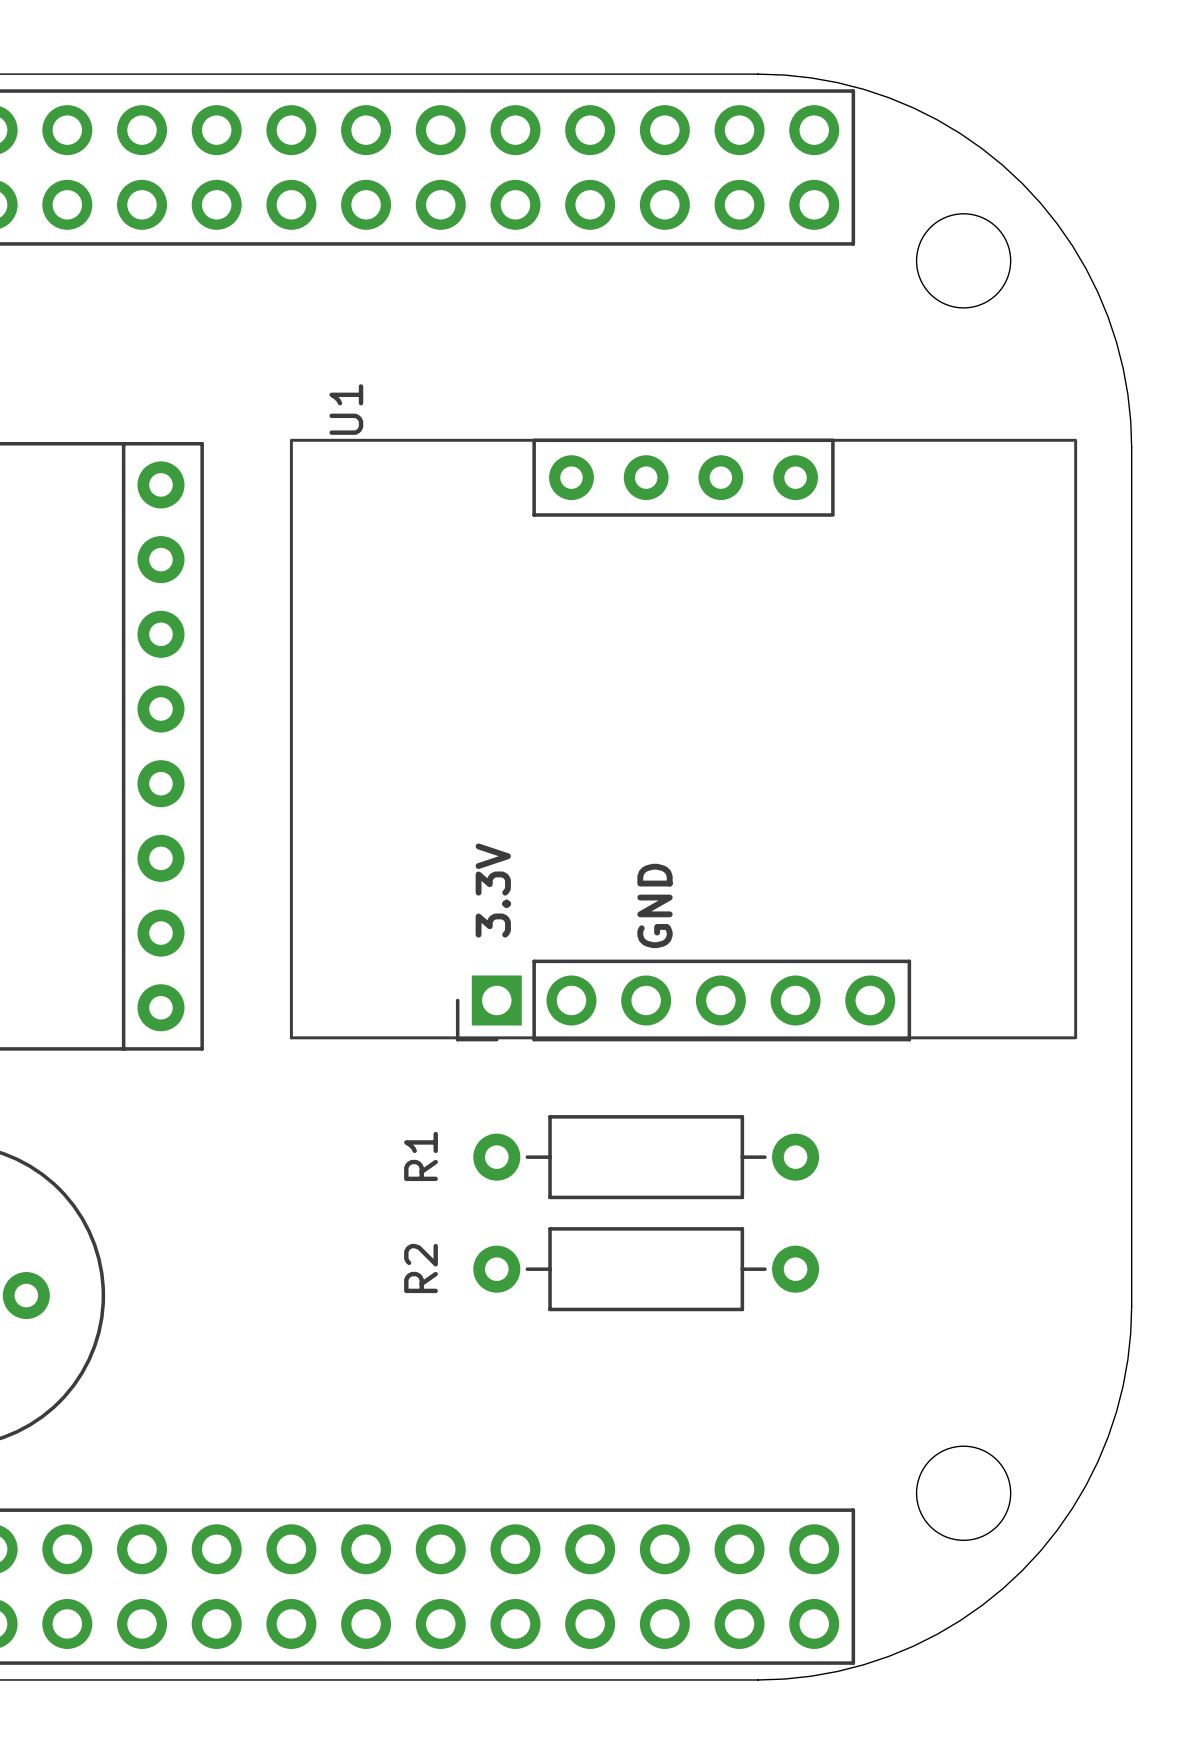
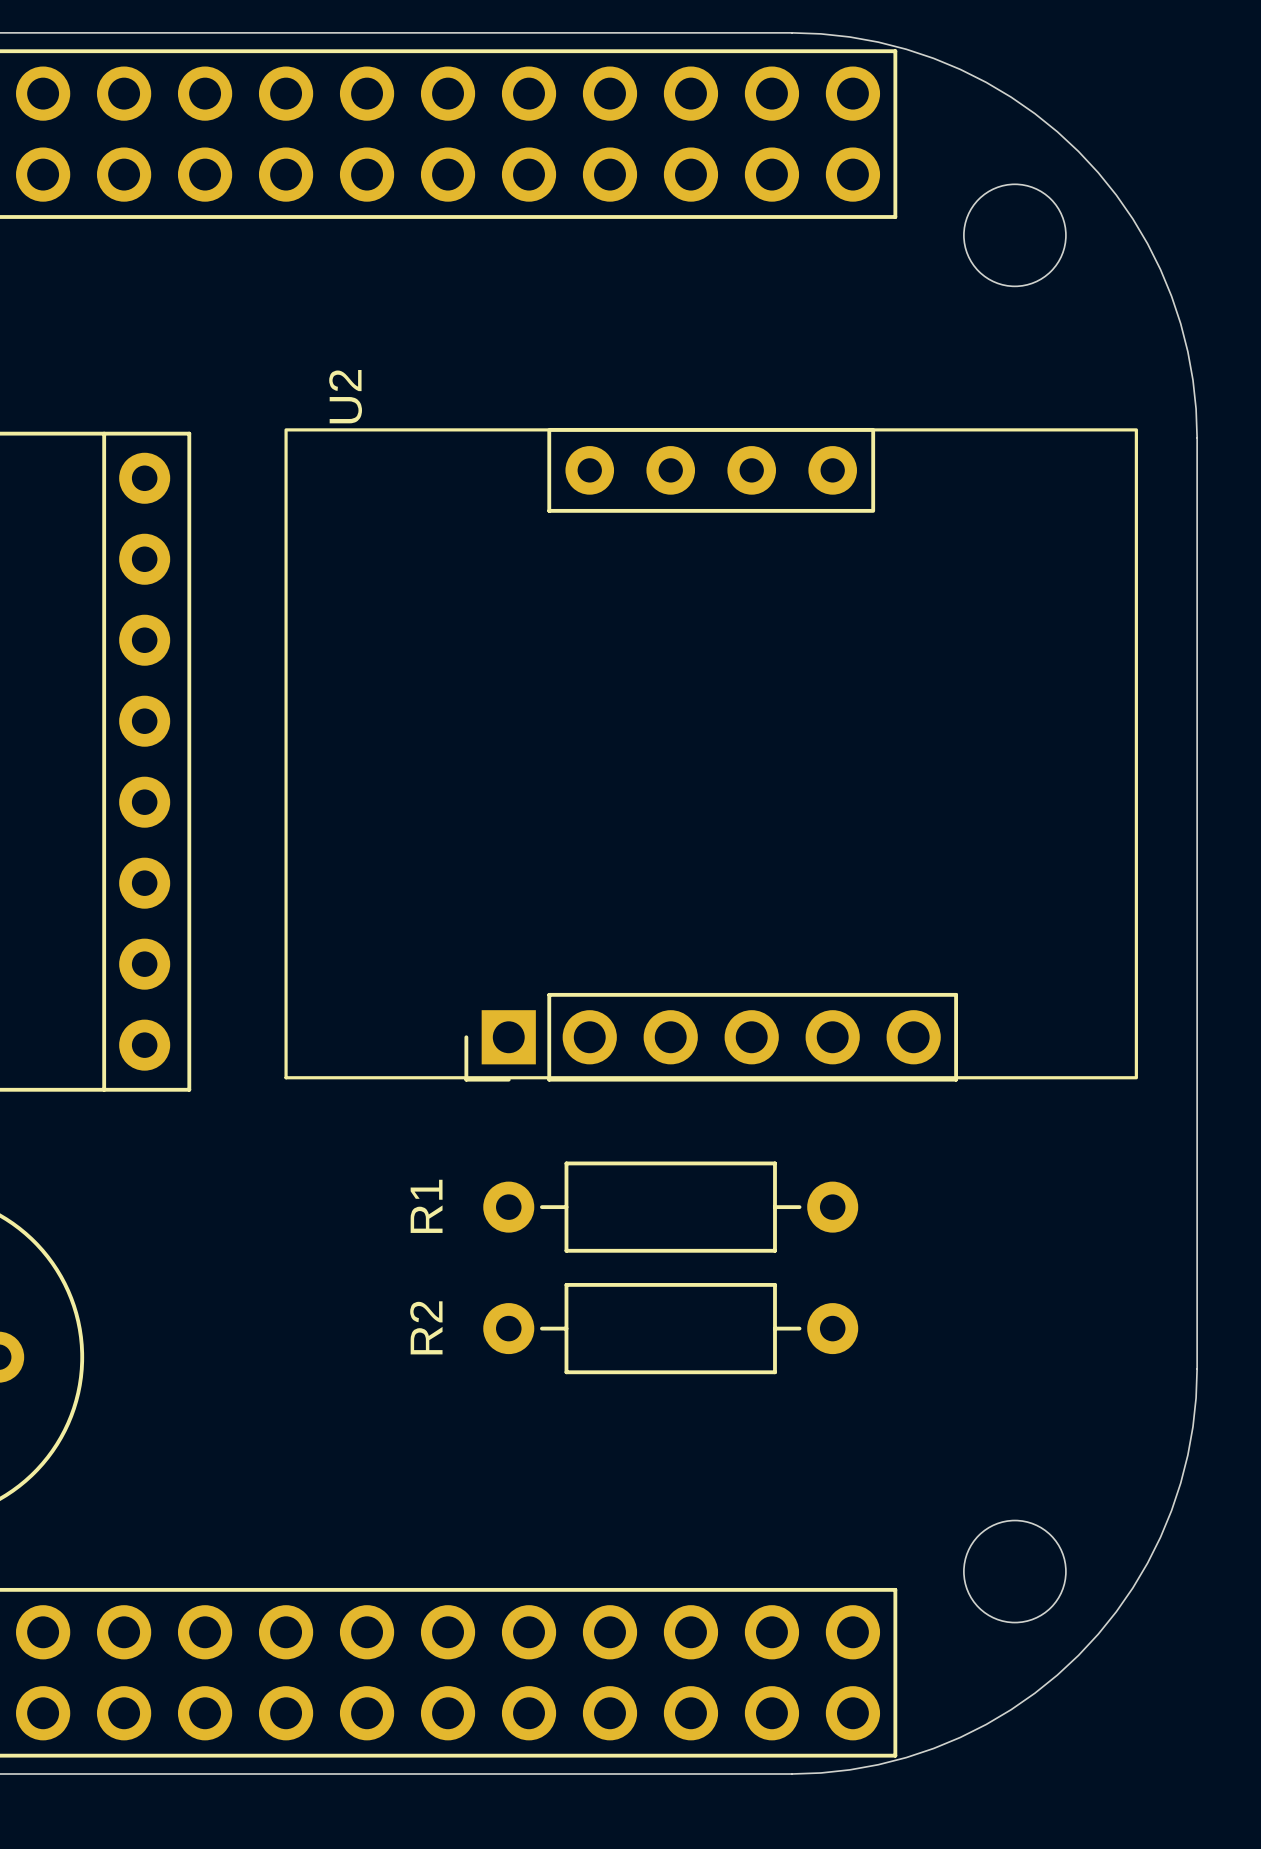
U1 name: U1 (346, 409) -> U2 (345, 396)
text: 3.3V (493, 890) -> none
text: GND (655, 905) -> none

